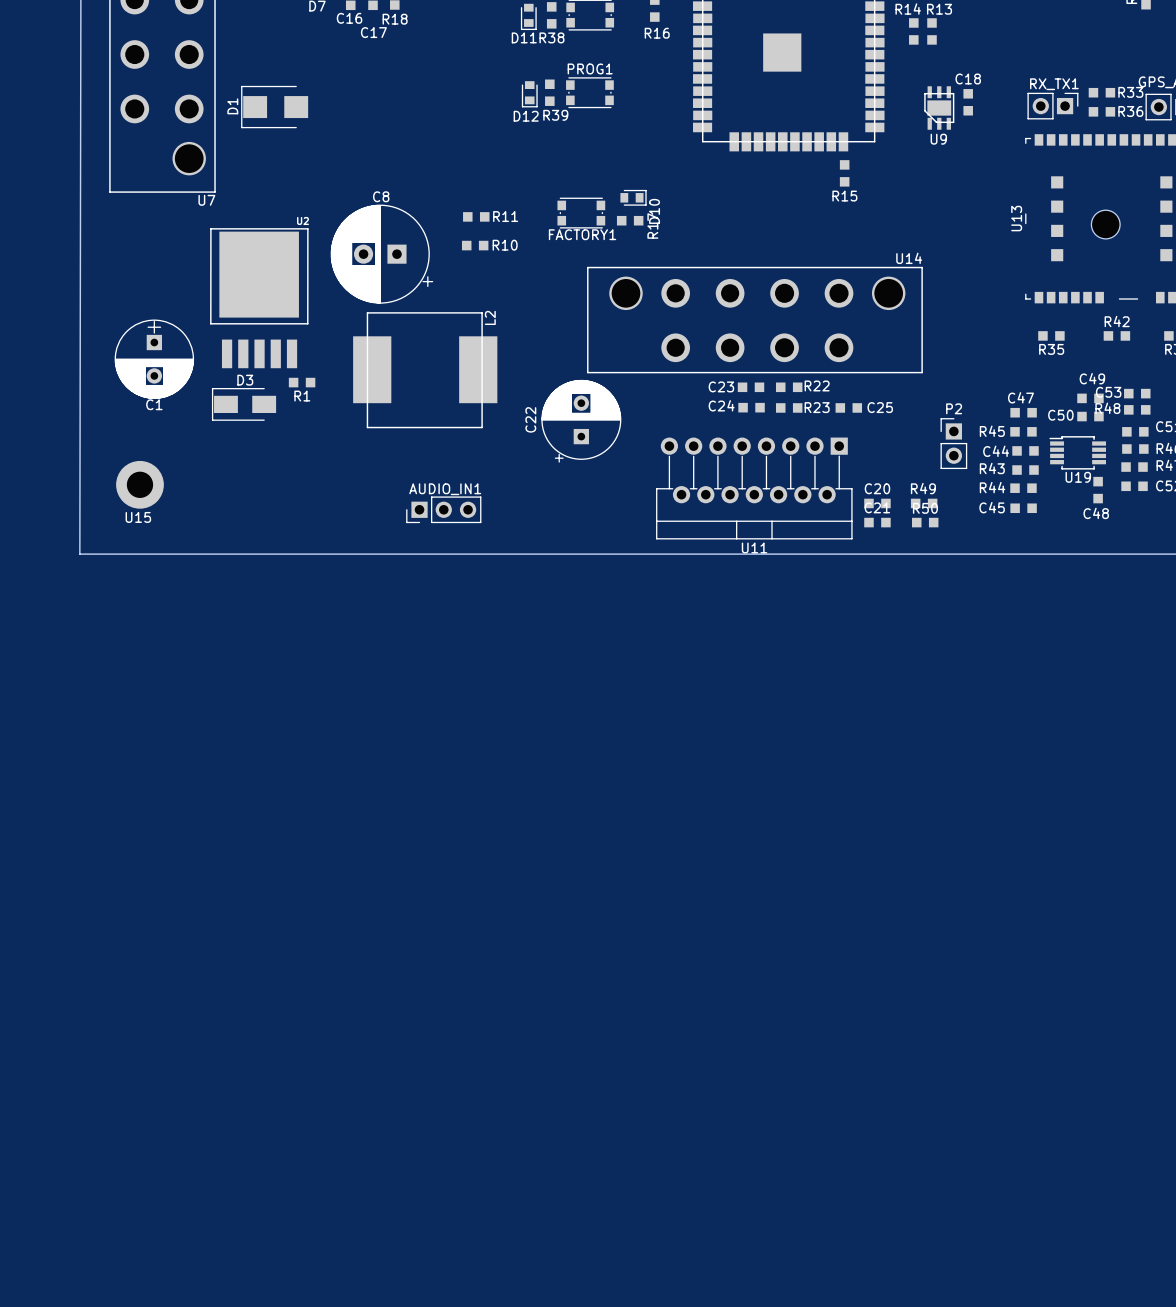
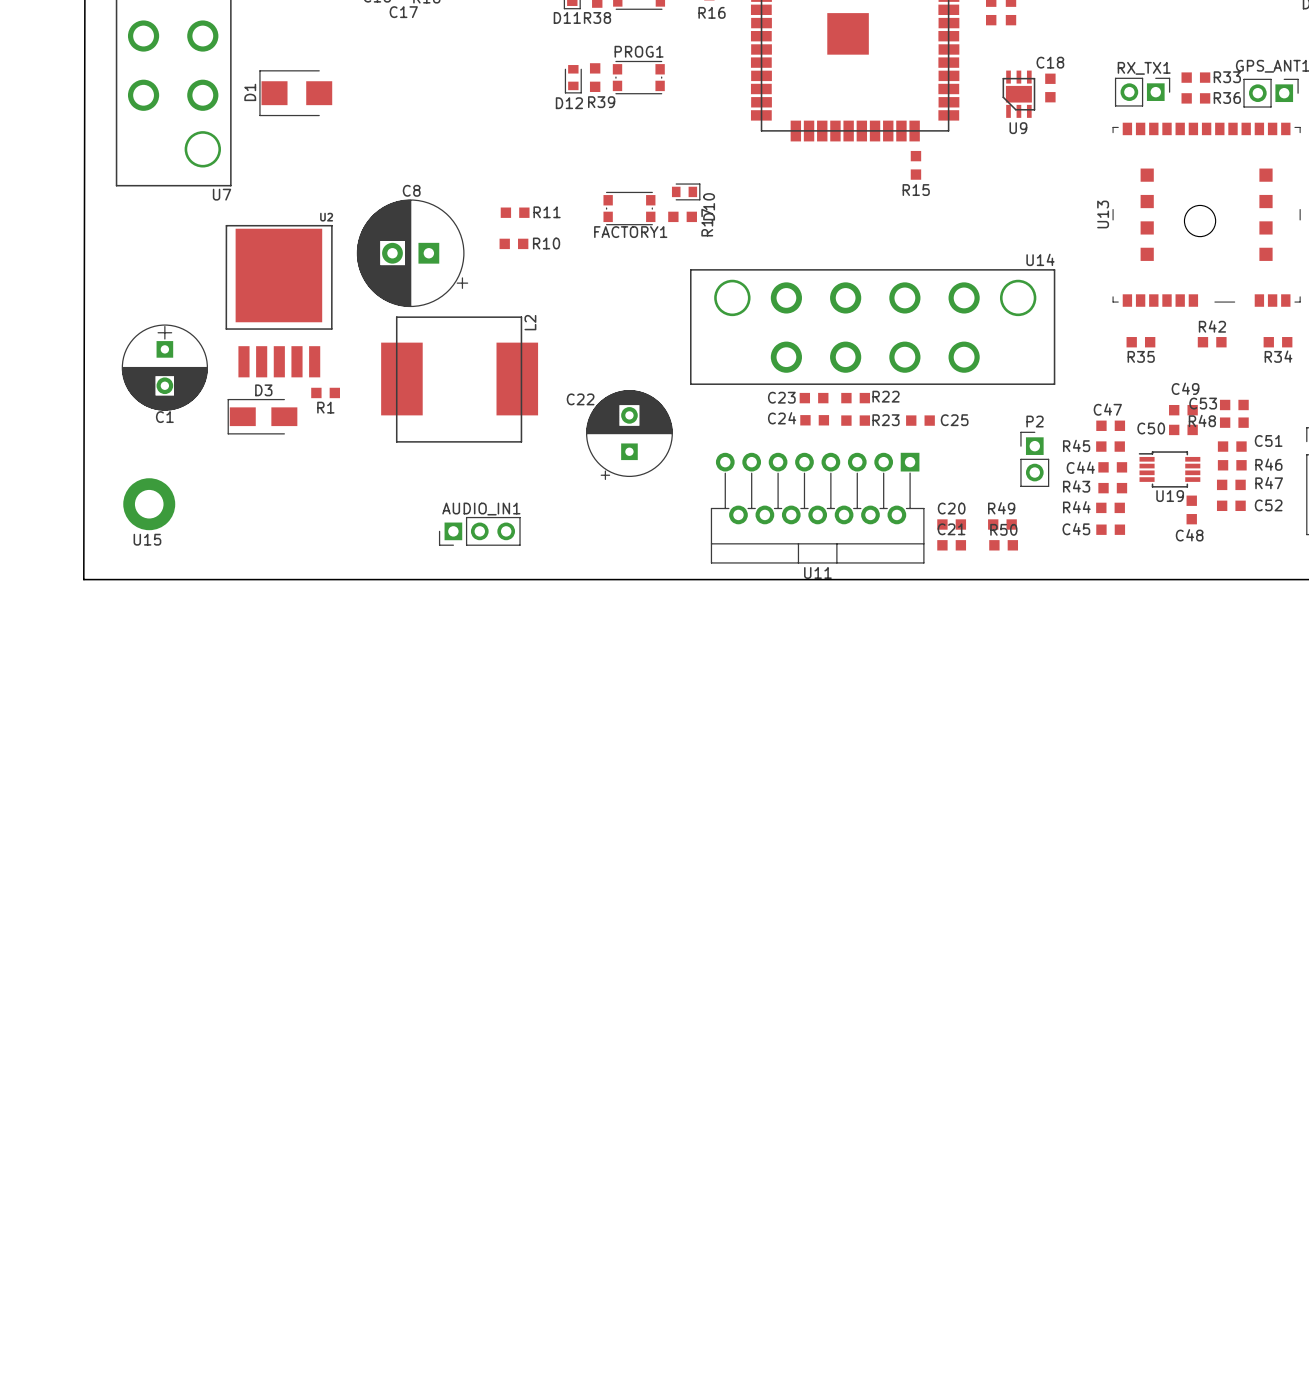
U14 position: (754, 320) -> (872, 327)
C22 name rotation: 0° (530, 419) -> 90° clockwise (580, 399)

